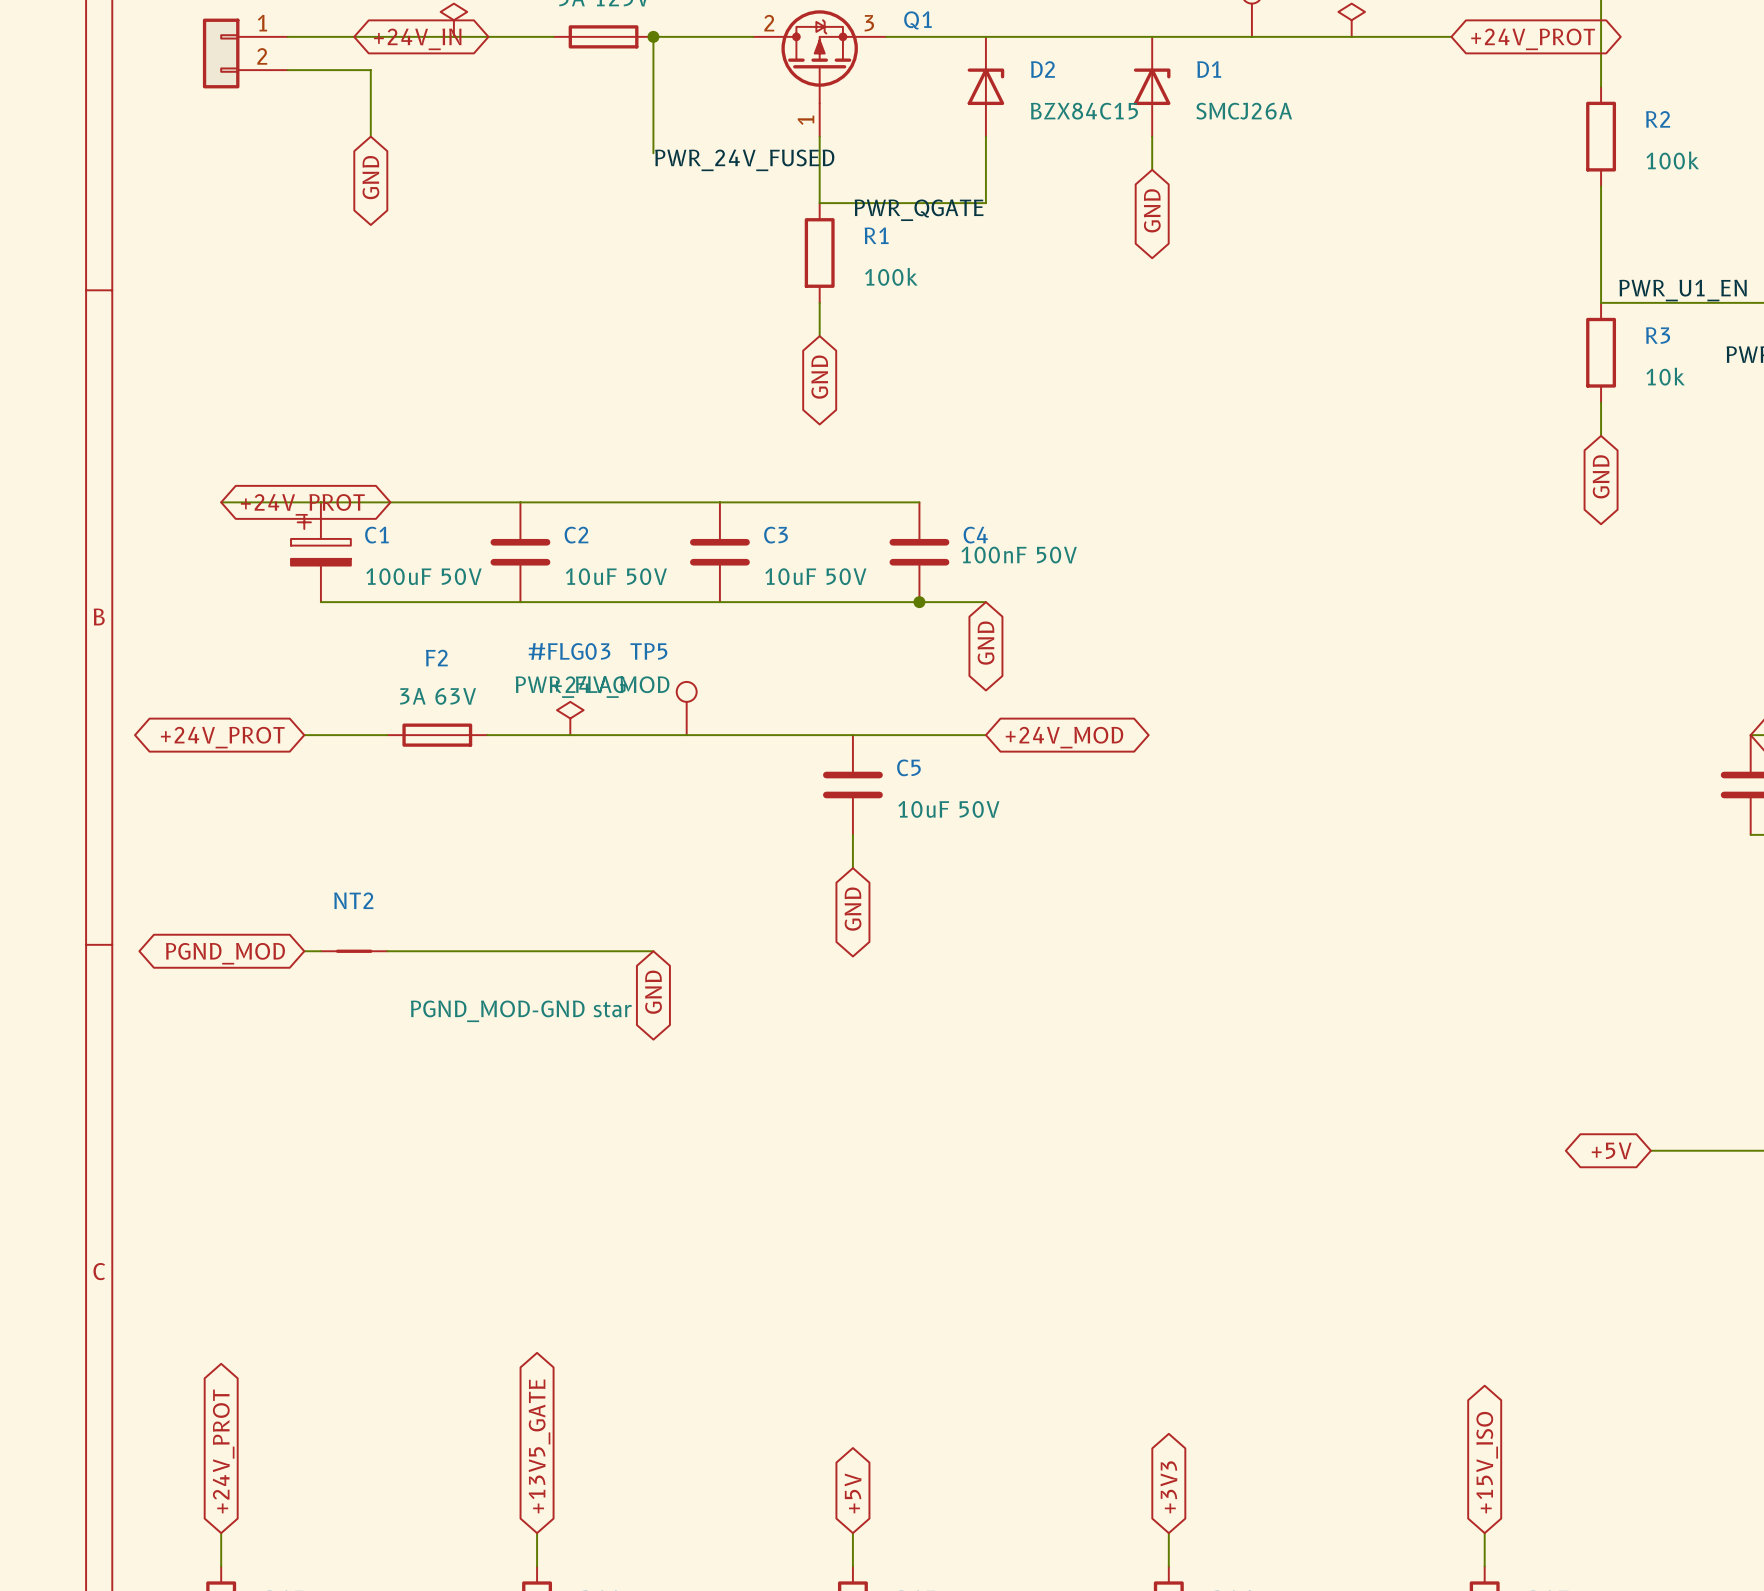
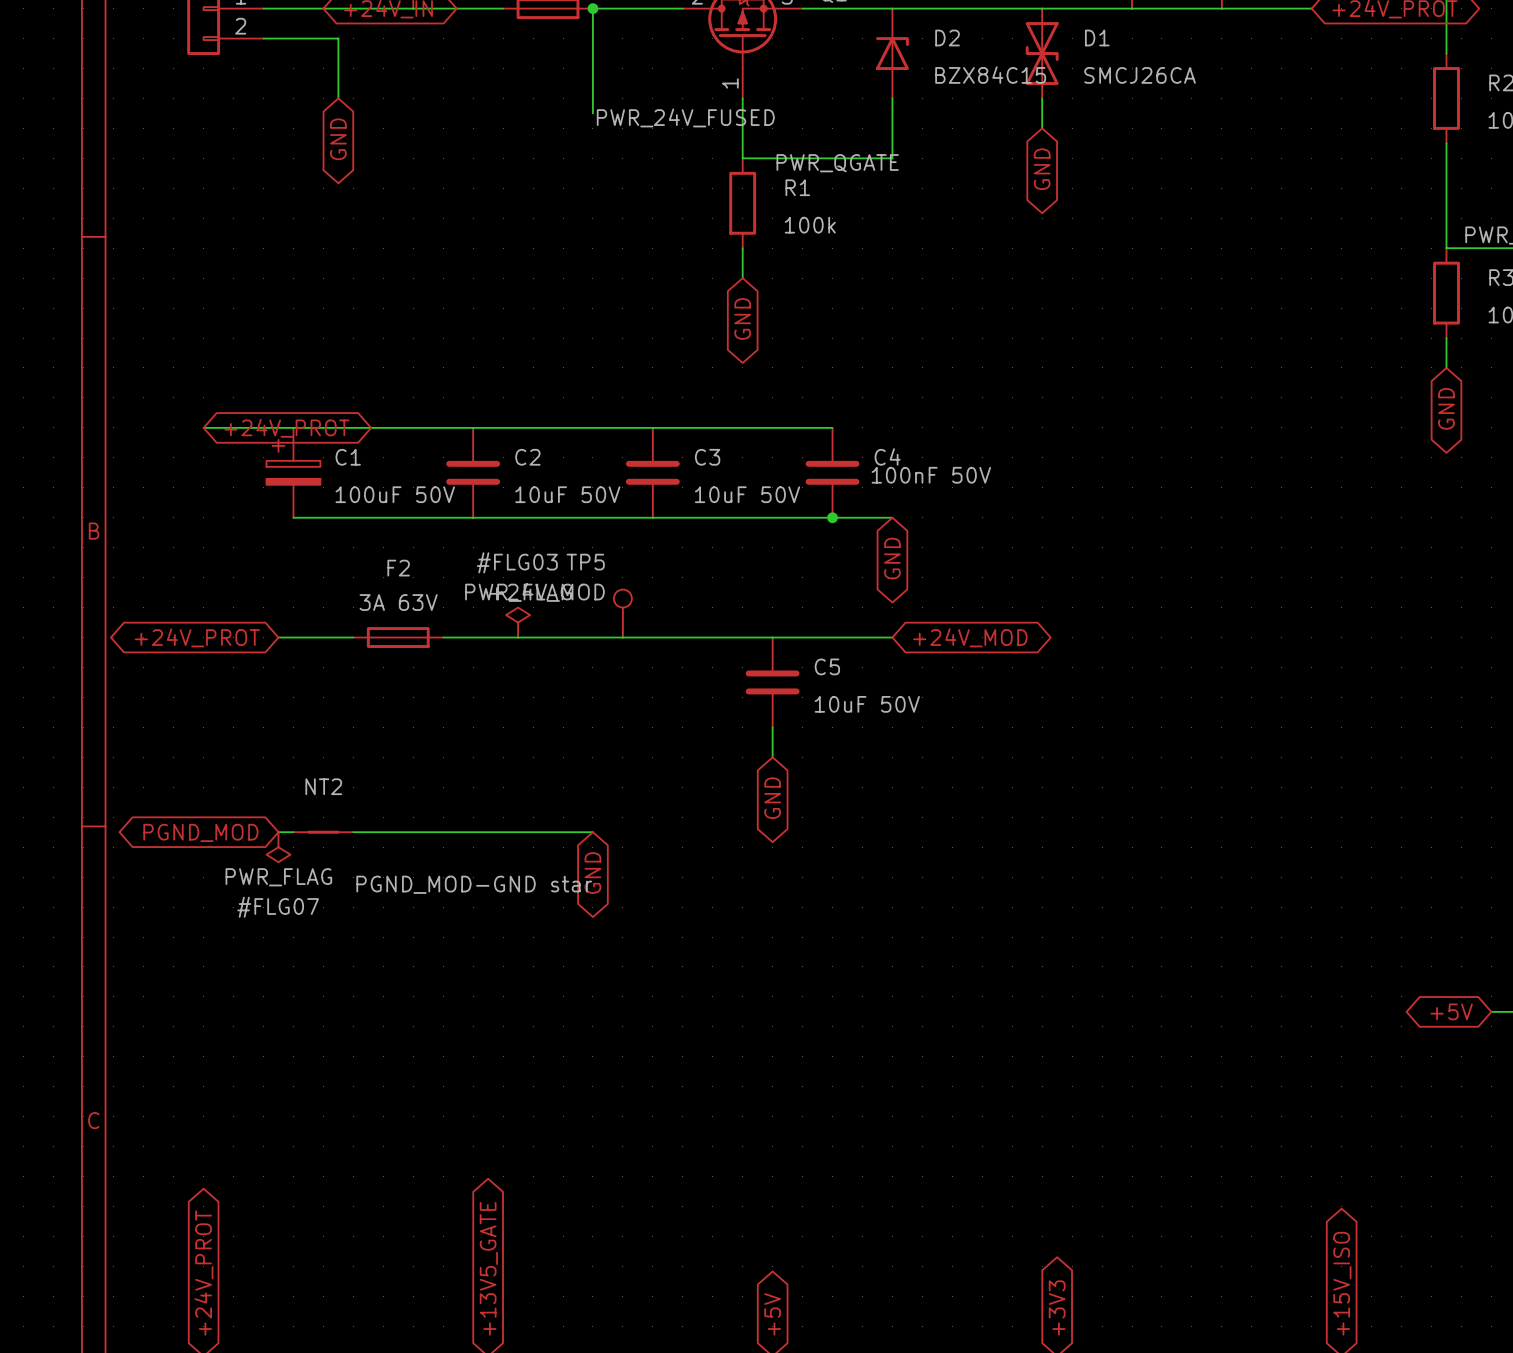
D1 symbol: [1133, 36, 1171, 137] -> [1025, 8, 1059, 99]
D1 value: SMCJ26A (1244, 111) -> SMCJ26CA (1140, 75)
#FLG07: none -> PWR_FLAG (278, 847)

